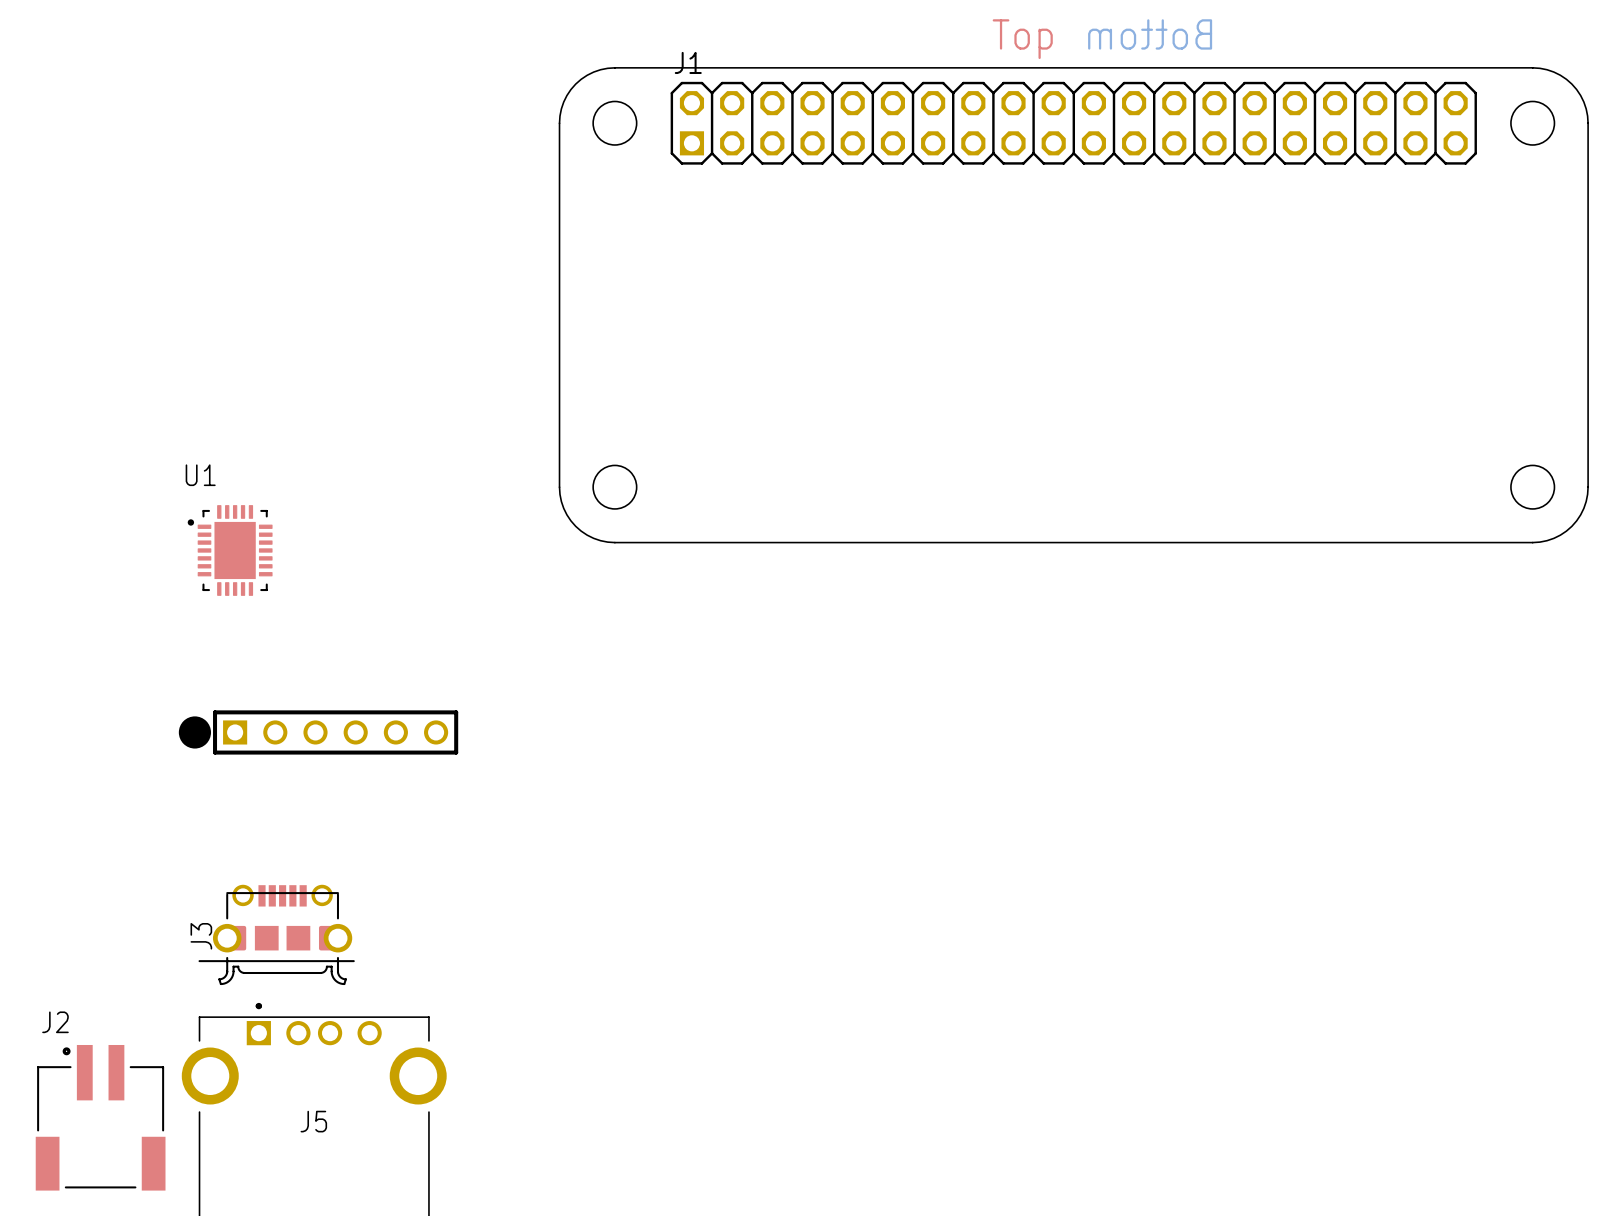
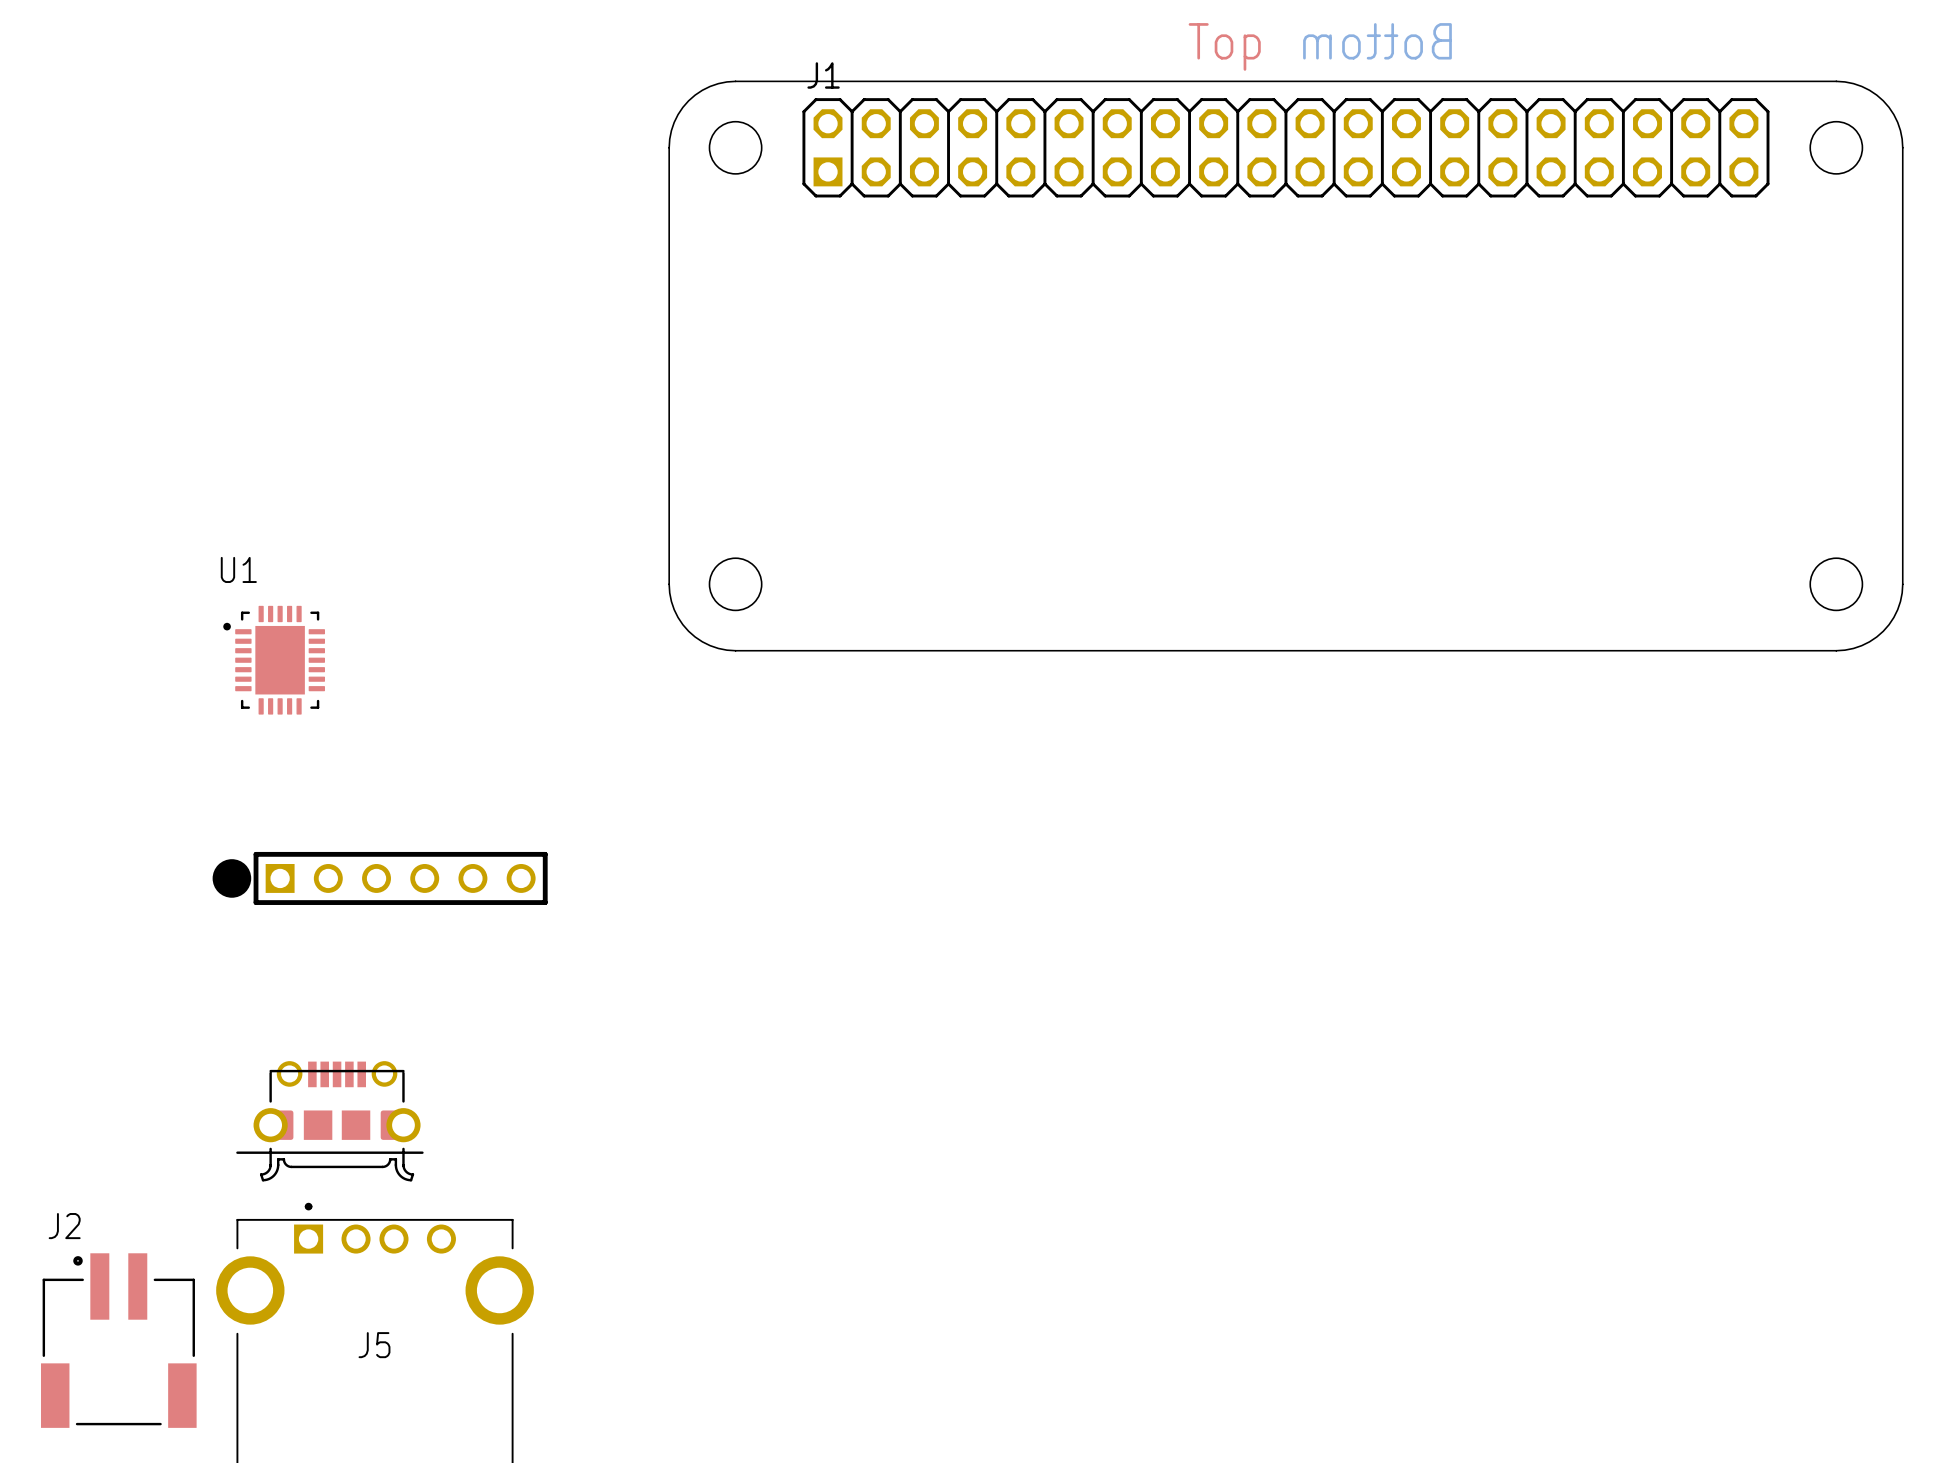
J3 name: J3 (201, 936) -> none

